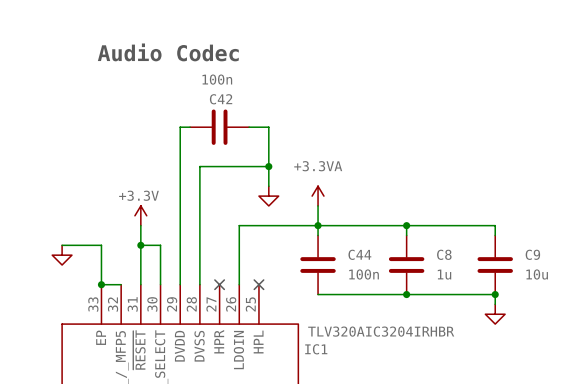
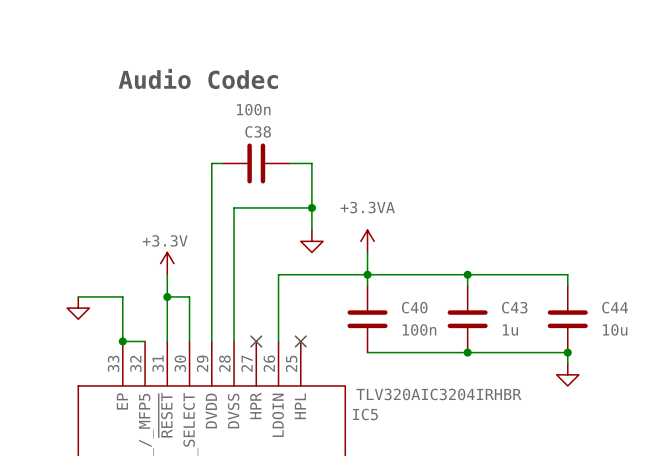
C42 name: C42 (221, 99) -> C38 (258, 131)
C44 name: C44 (359, 254) -> C40 (414, 307)
C8 name: C8 (444, 254) -> C43 (514, 307)
C9 name: C9 (532, 254) -> C44 (615, 307)
IC1 name: IC1 (316, 349) -> IC5 (365, 414)

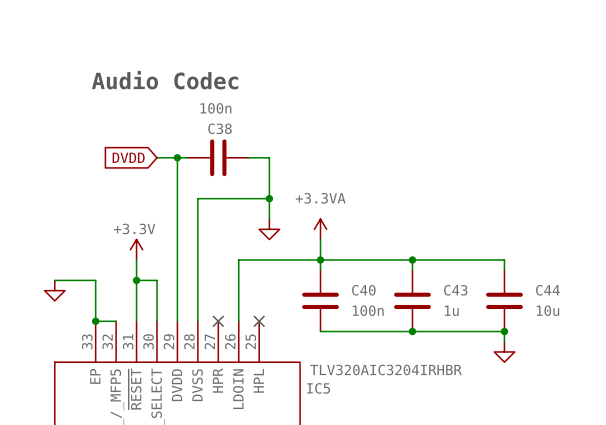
global label: none -> DVDD (128, 157)
wire: none -> (156, 157) (177, 157)
junction: none -> (177, 157)

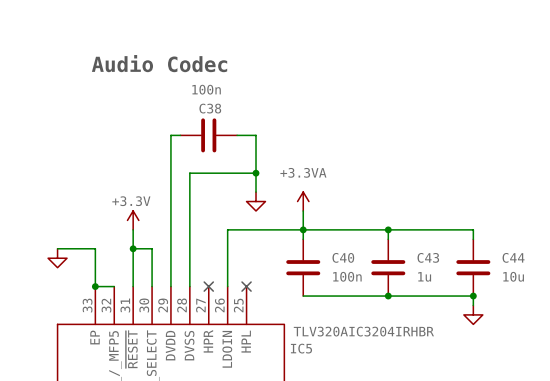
global label: DVDD (128, 157) -> none
wire: (156, 157) (177, 157) -> none
junction: (177, 157) -> none

